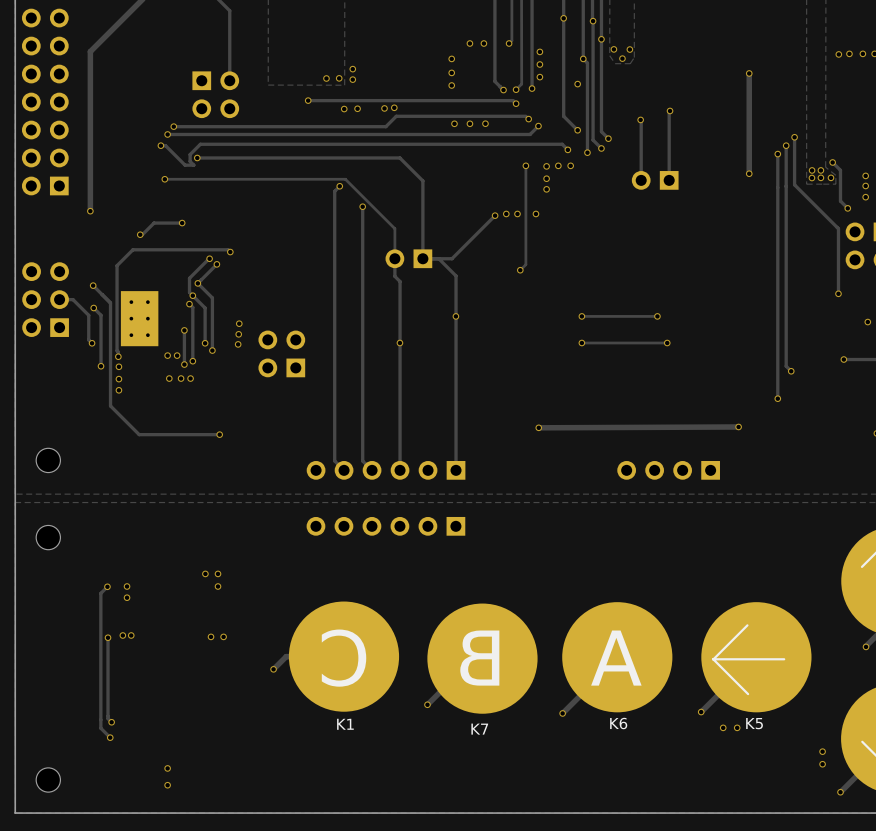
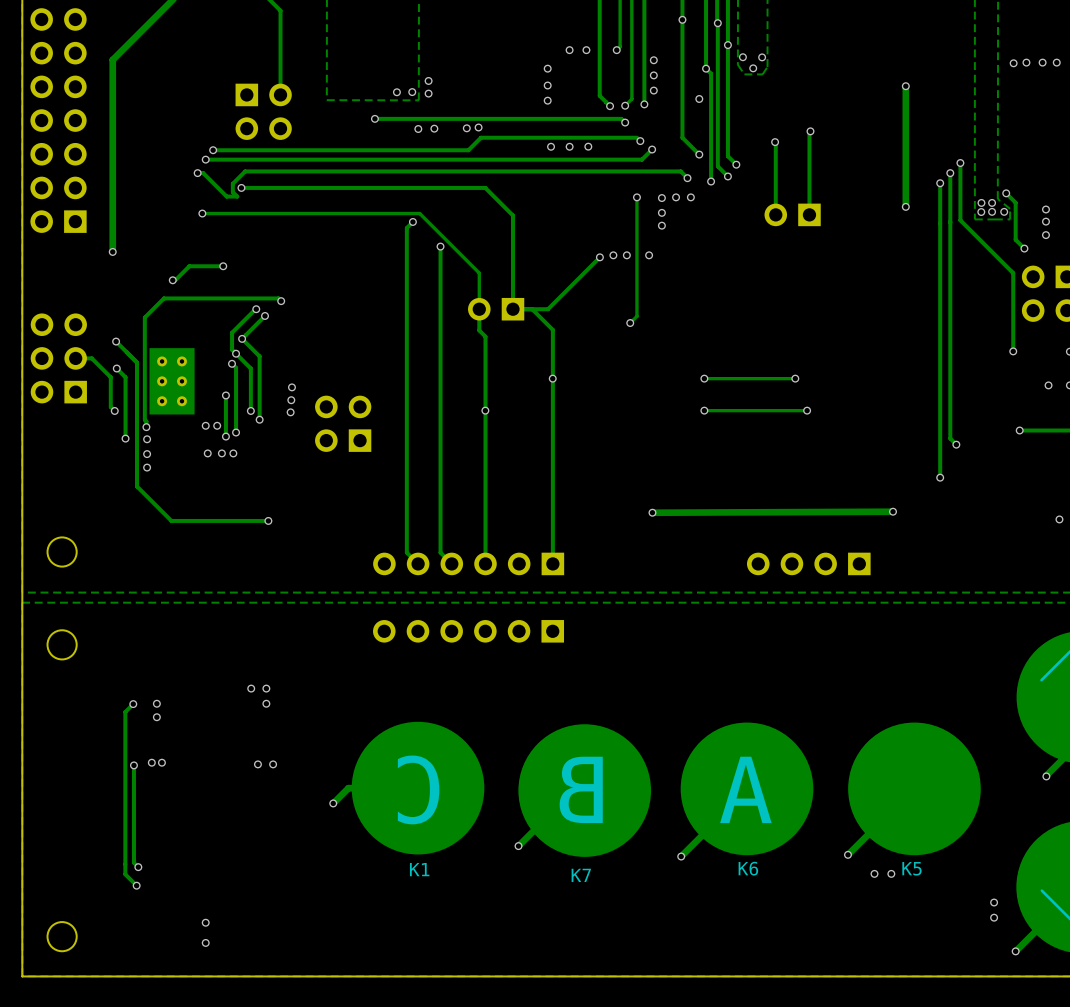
line: (747, 625) (713, 659) -> none
line: (784, 659) (713, 659) (748, 694) -> none

